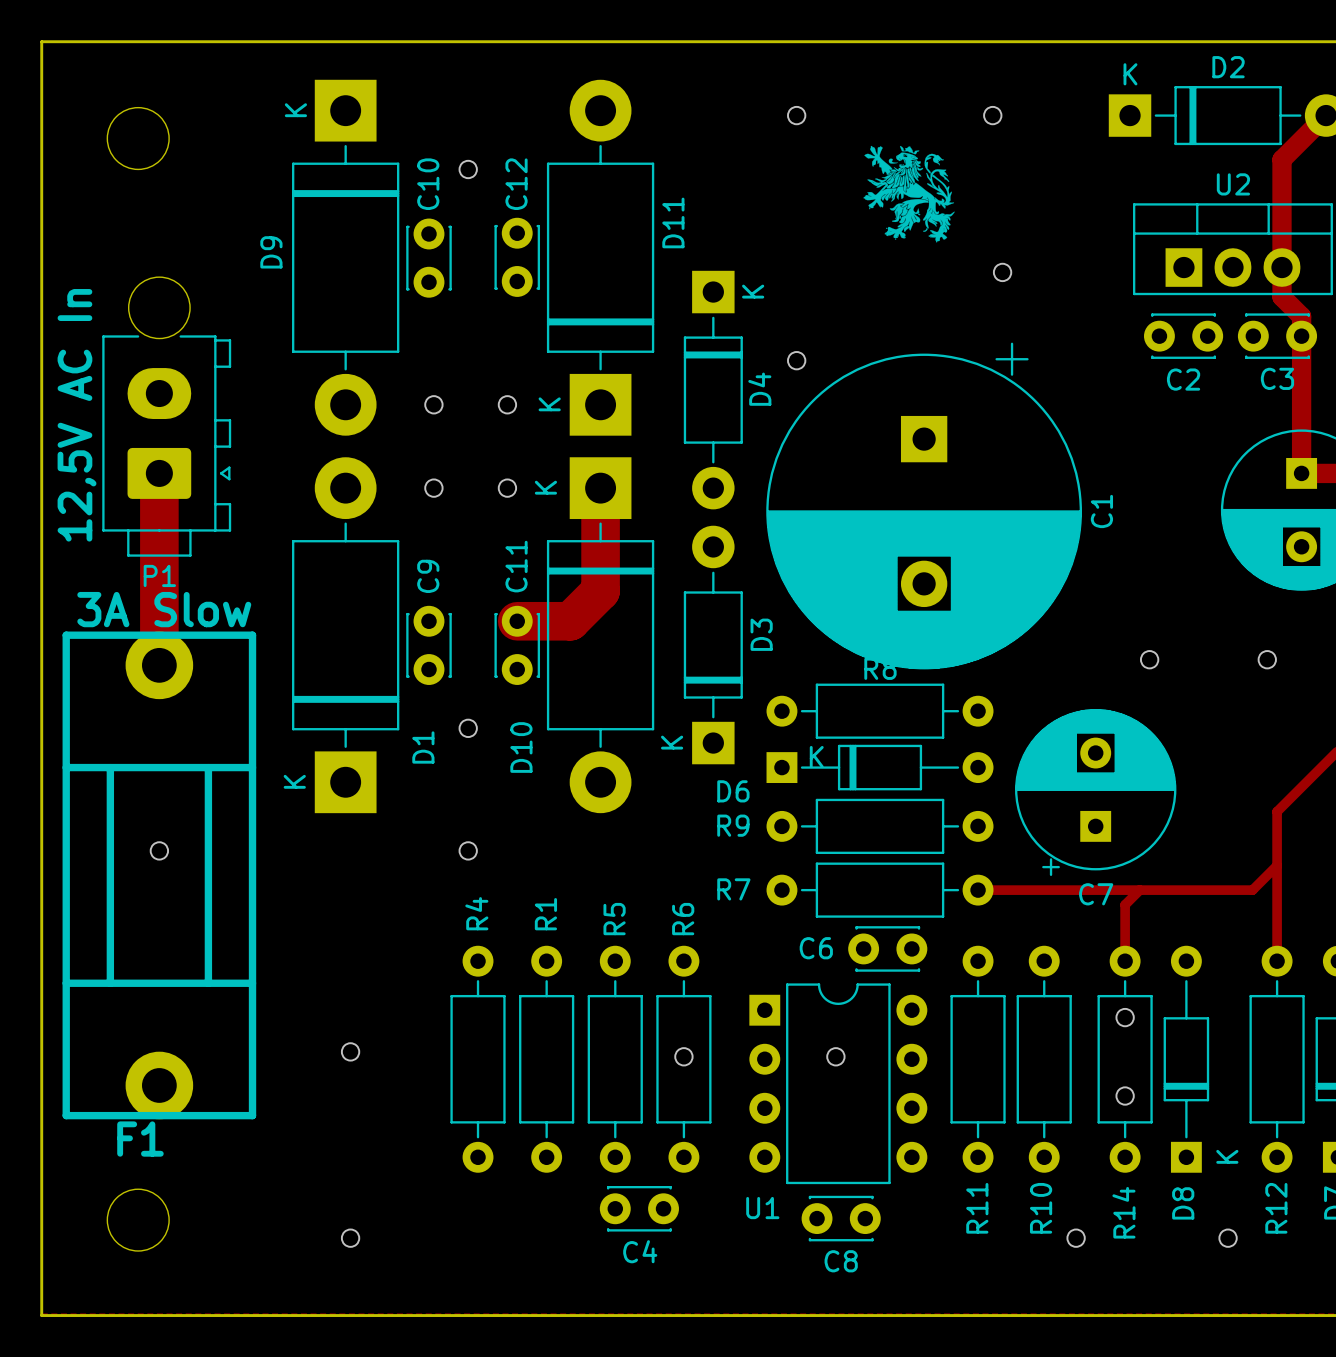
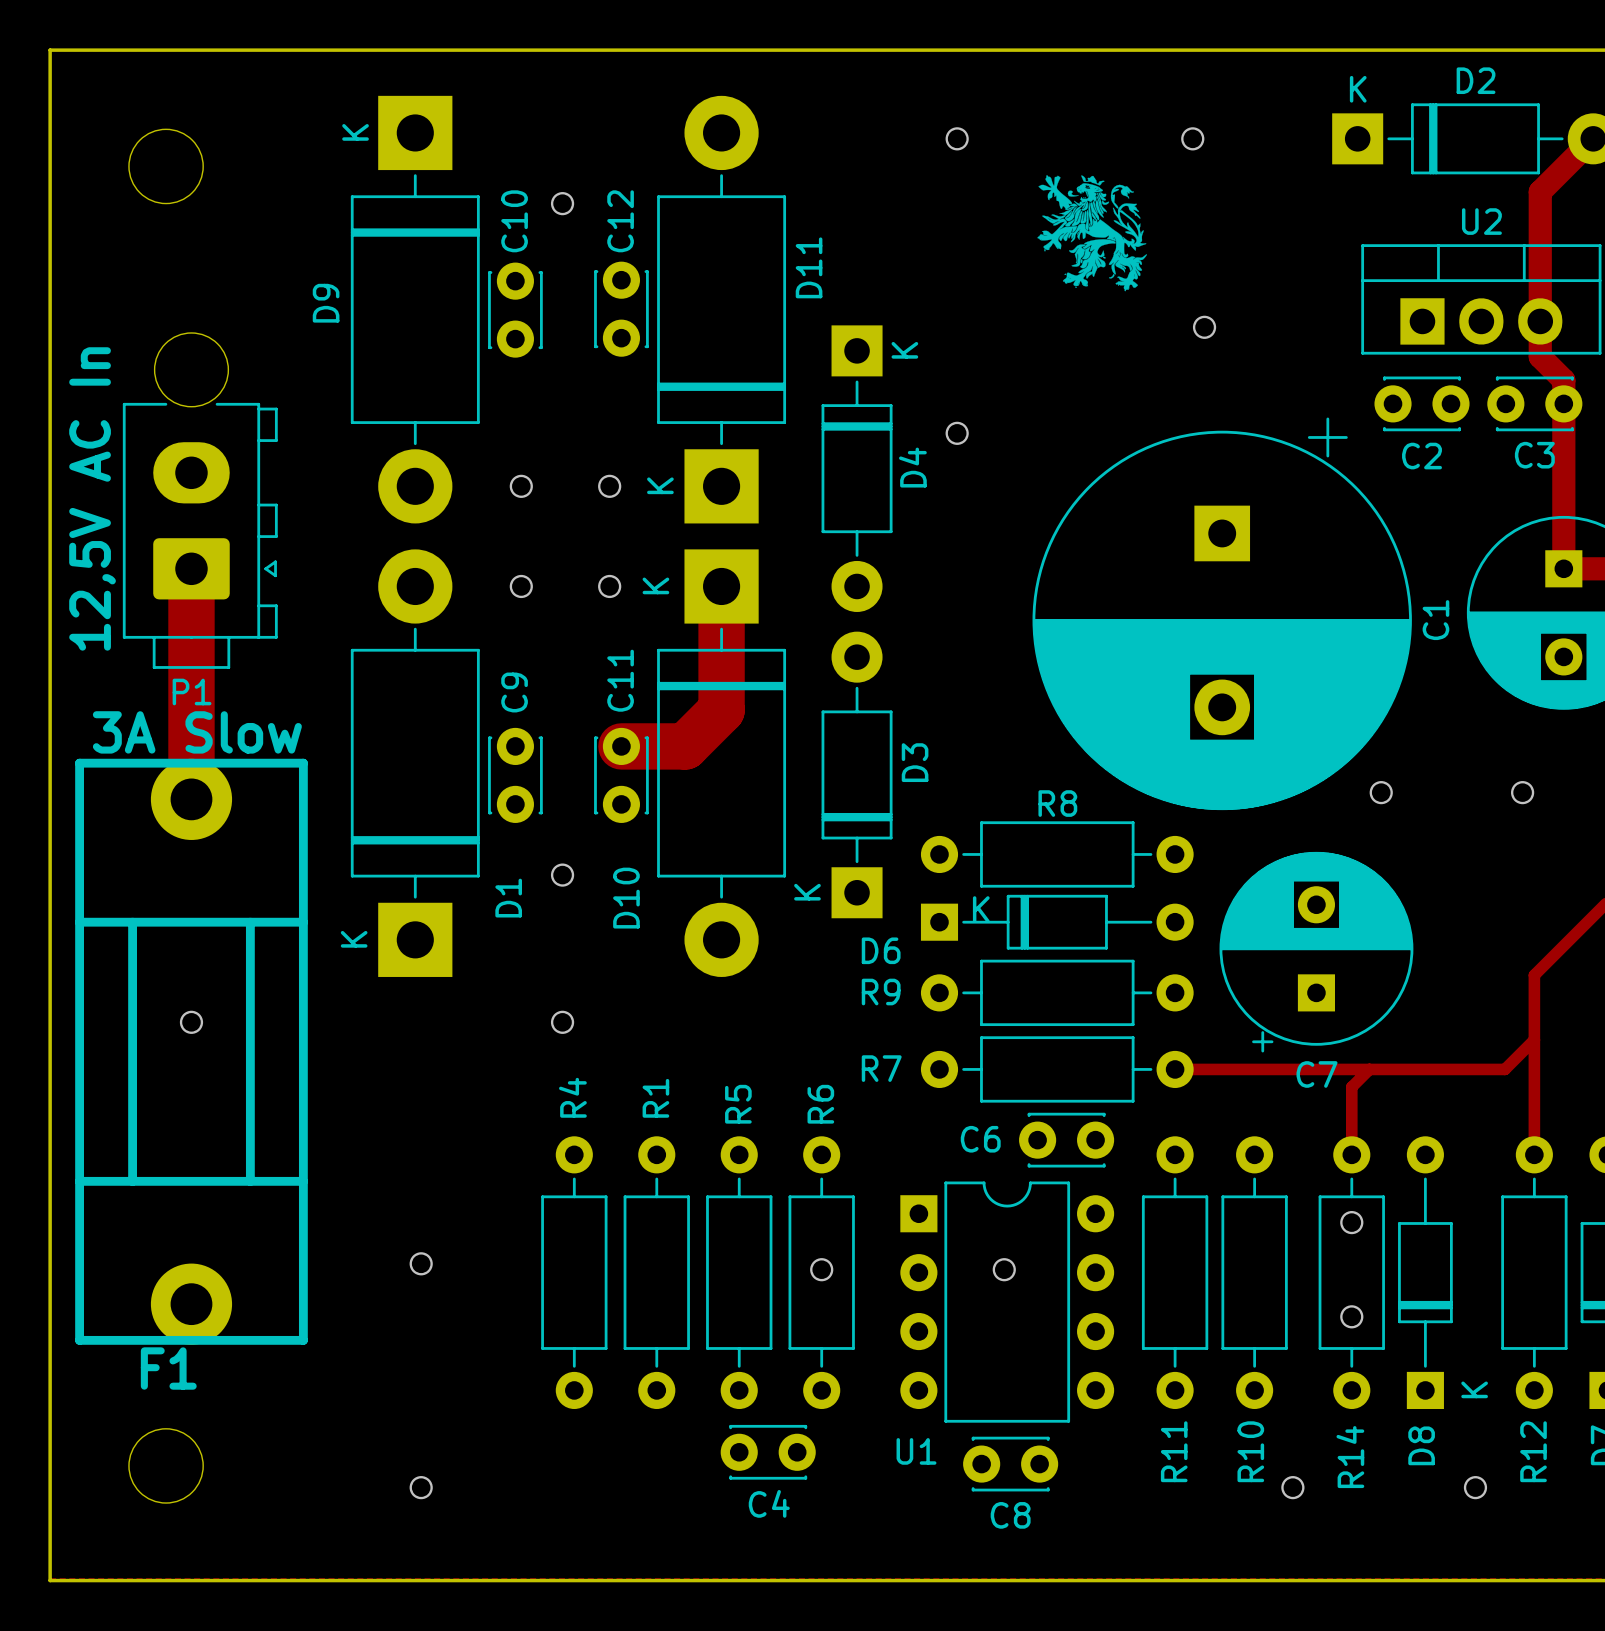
C1 position: (924, 505) -> (1222, 613)

